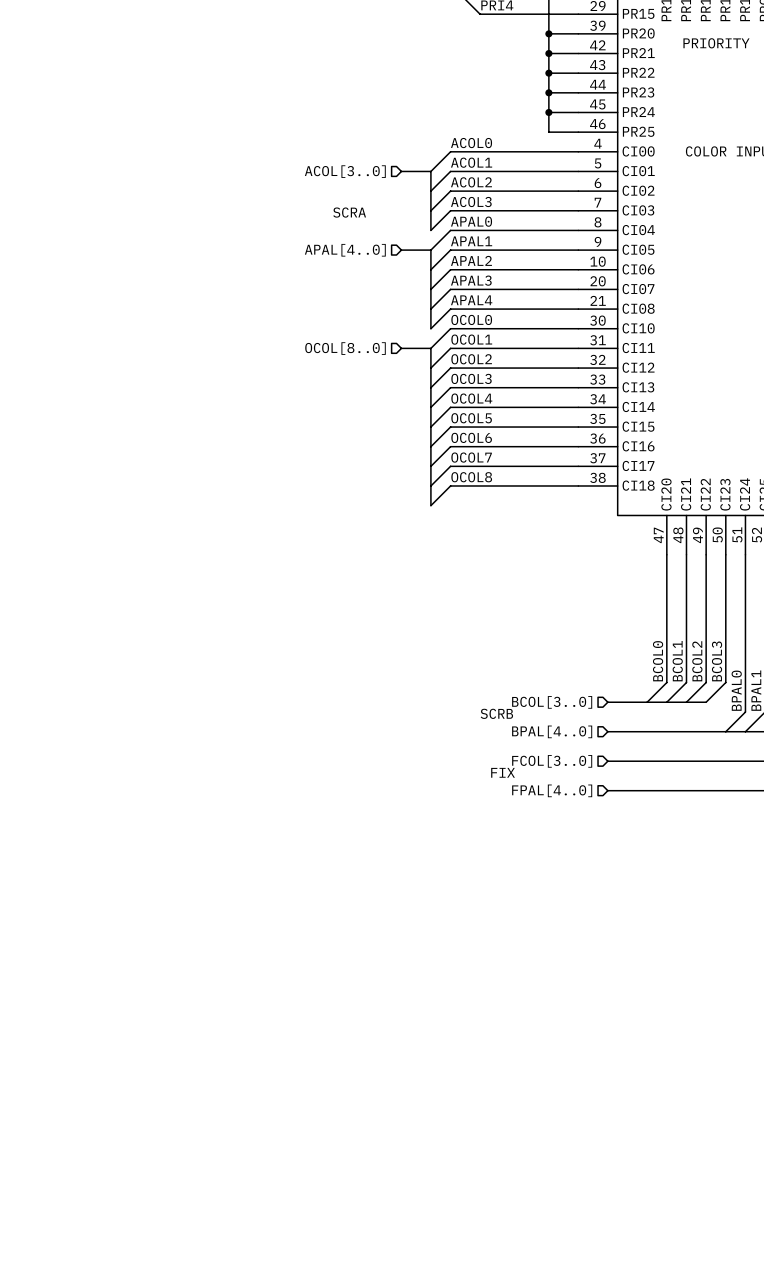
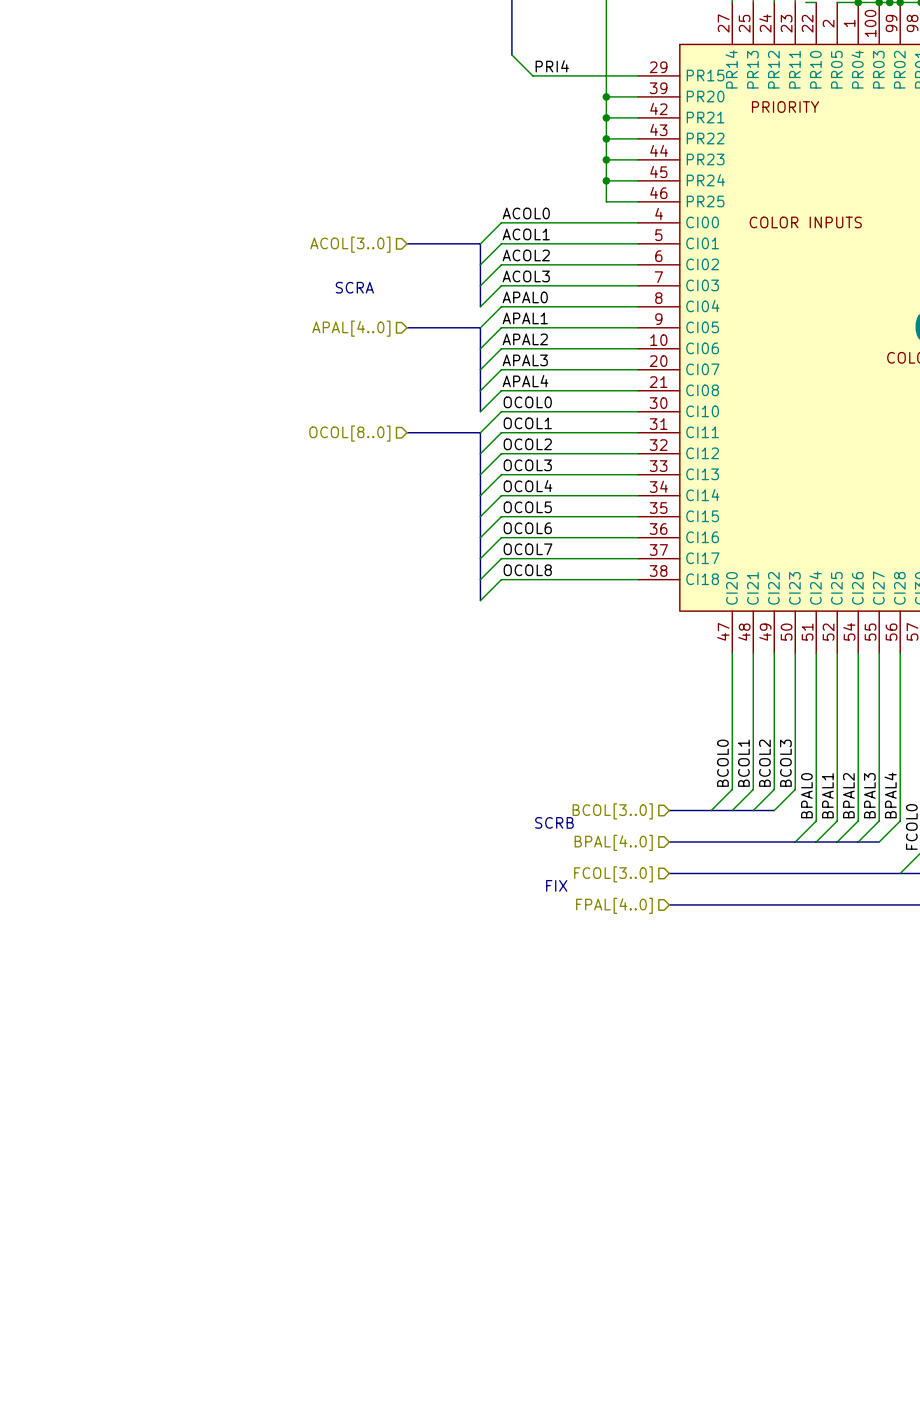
hierarchical label position: ACOL[3..0] (345, 171) -> ACOL[3..0] (350, 244)
bus: none -> (406, 243) (448, 243)
text position: SCRA (349, 212) -> SCRA (354, 287)
hierarchical label position: APAL[4..0] (345, 250) -> APAL[4..0] (351, 328)
bus: none -> (406, 327) (448, 327)
hierarchical label position: OCOL[8..0] (345, 348) -> OCOL[8..0] (349, 433)
bus: none -> (406, 432) (448, 432)

